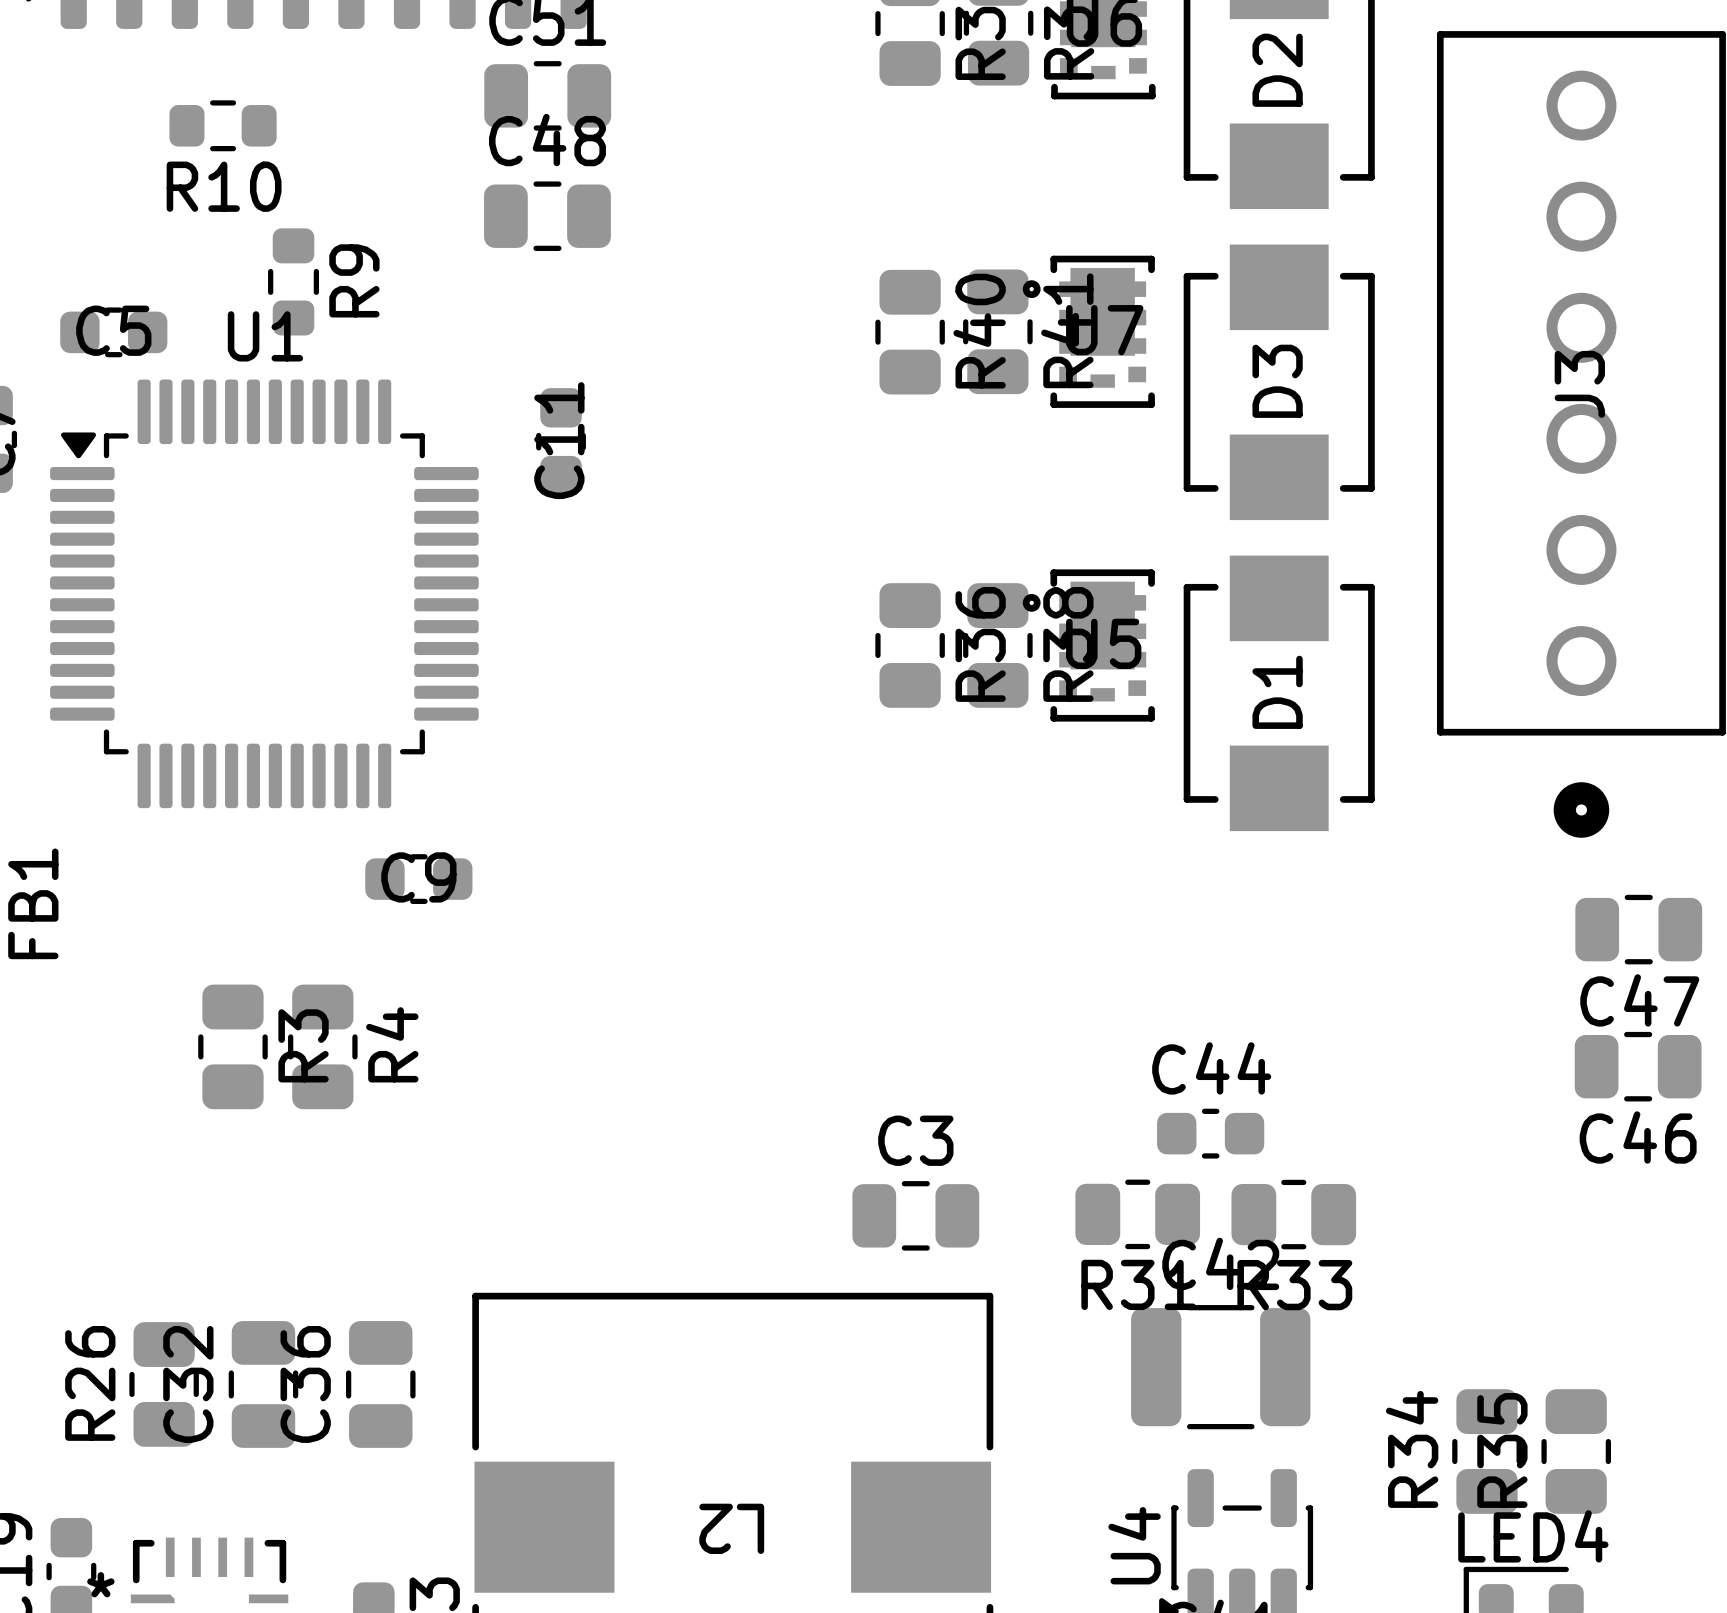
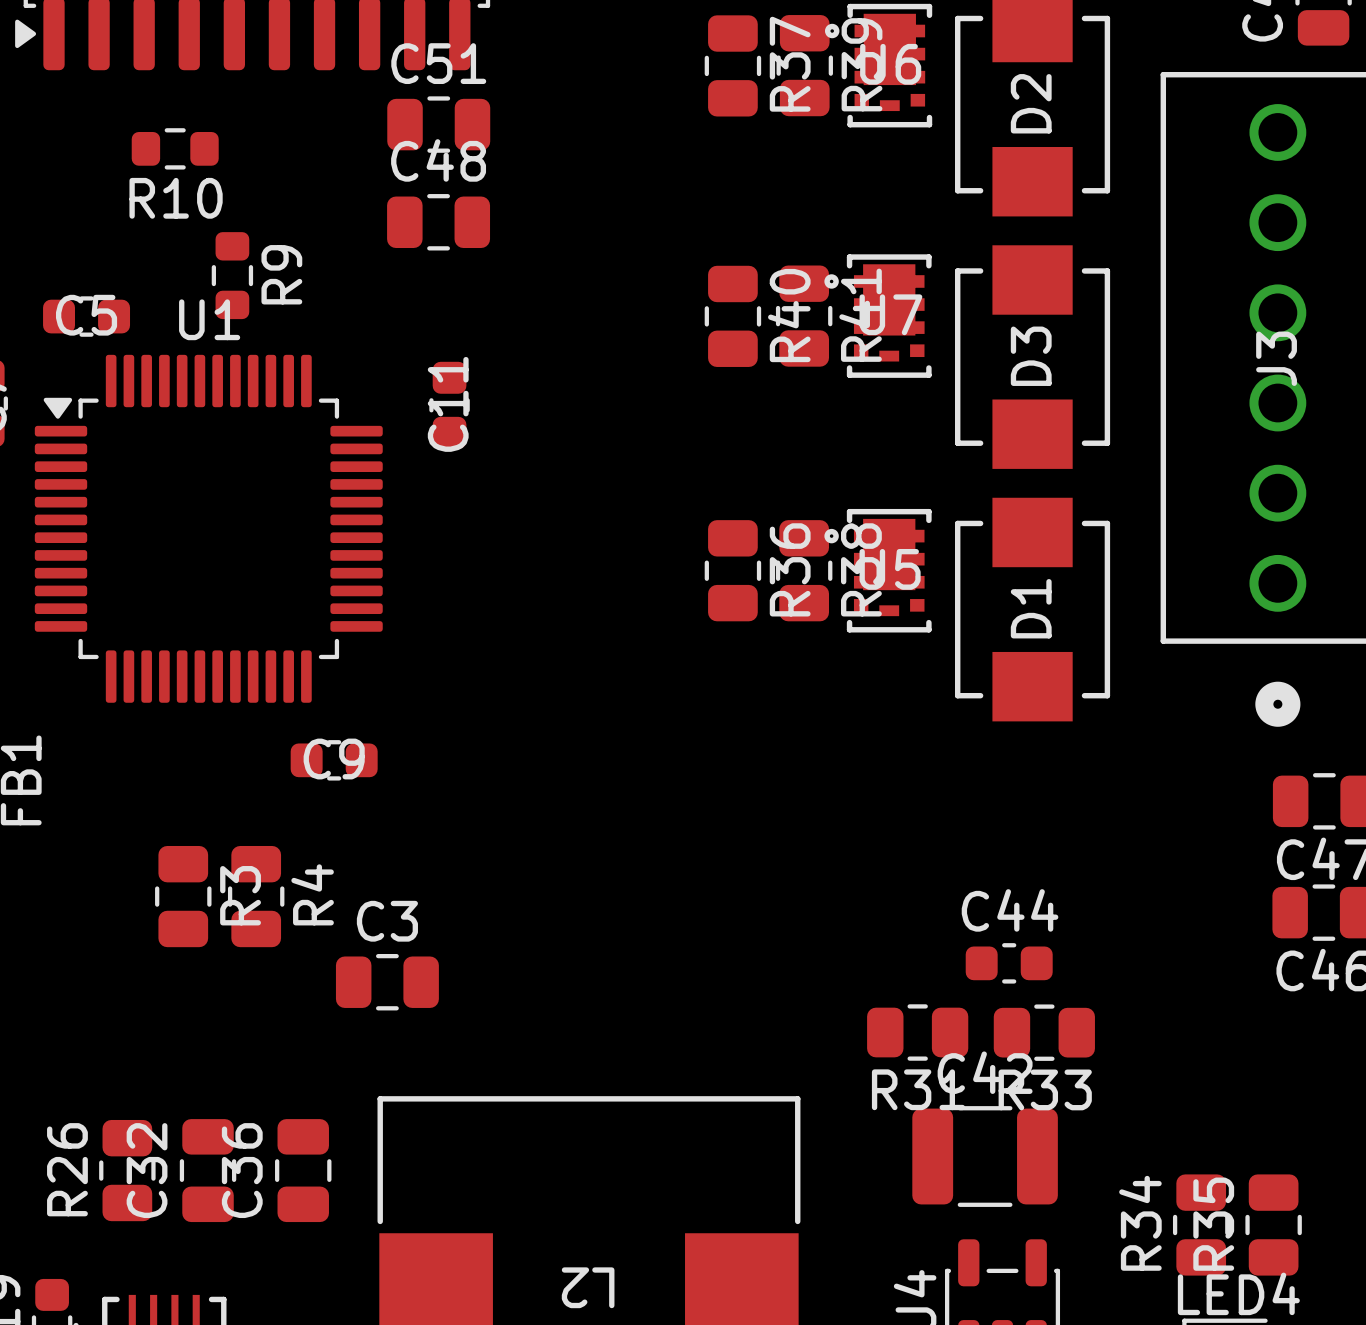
C44 position: (1210, 1133) -> (1009, 963)
C3 position: (915, 1215) -> (387, 982)

